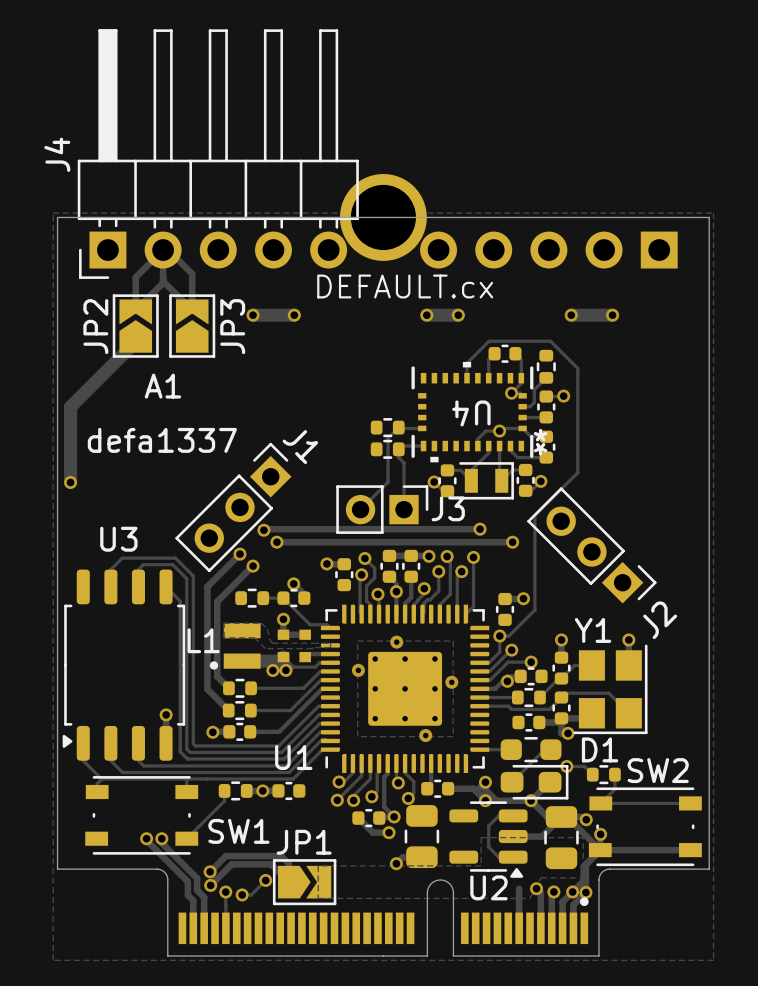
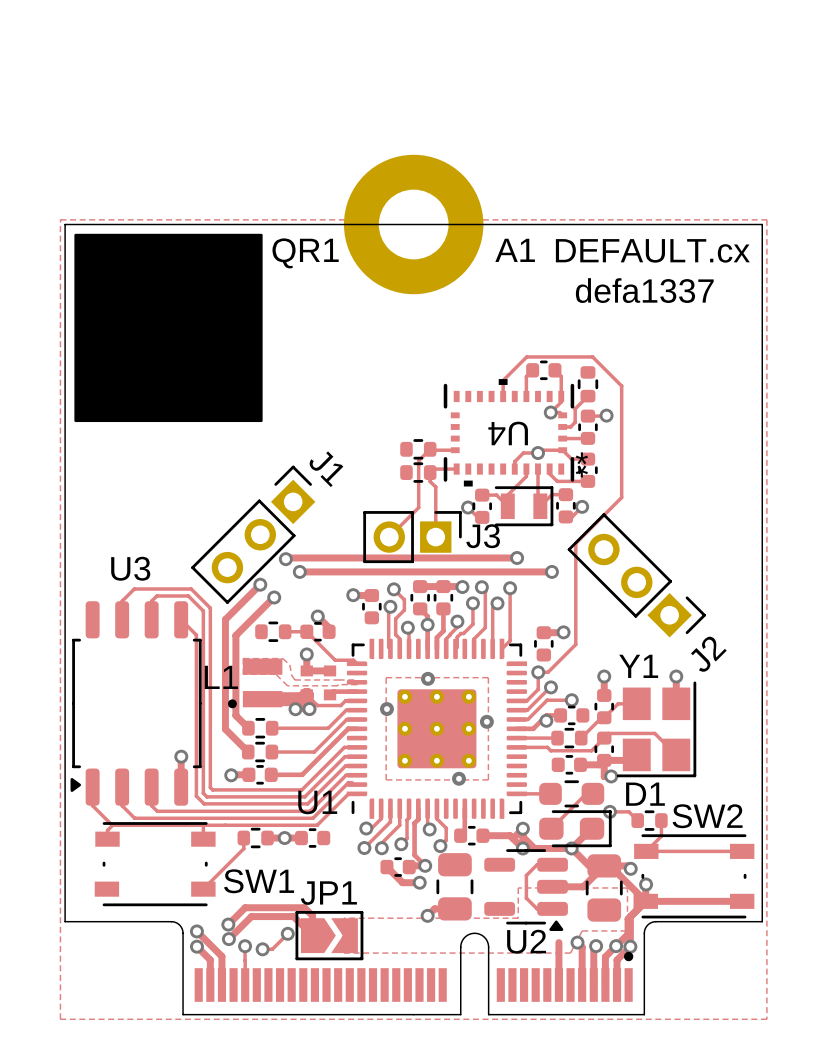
J4: (218, 154) -> none
A1 footprint: [57, 174, 710, 957] -> [64, 154, 763, 1016]
track: (163, 250) (135, 277) (135, 310) (163, 282) (163, 250) -> none
track: (163, 250) (168, 250) (192, 273) (192, 310) (163, 281) -> none
part: (548, 250) -> none
QR1: none -> (168, 327)
track: (253, 315) (294, 315) -> none
via: (253, 315) -> none
via: (294, 315) -> none
track: (426, 315) (458, 315) -> none
via: (426, 315) -> none
via: (458, 315) -> none
track: (571, 315) (612, 315) -> none
via: (571, 315) -> none
via: (612, 315) -> none
JP2: (135, 326) -> none
JP3: (192, 326) -> none
track: (135, 341) (70, 406) (70, 482) -> none
A1 name position: A1 (162, 386) -> A1 (515, 250)
text position: defa1337 (162, 440) -> defa1337 (644, 290)
via: (70, 482) -> none
track: (146, 838) (187, 881) (187, 895) (193, 900) (193, 904) -> (196, 946) (210, 960)
via: (146, 838) -> none
track: (161, 838) (161, 843) (197, 878) (197, 890) (204, 897) (204, 901) -> (196, 931) (221, 956)
via: (161, 838) -> none
via: none -> (196, 931)
via: none -> (196, 946)

